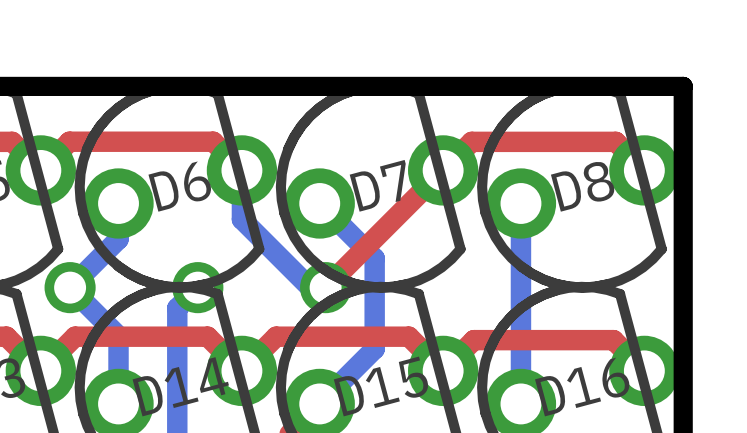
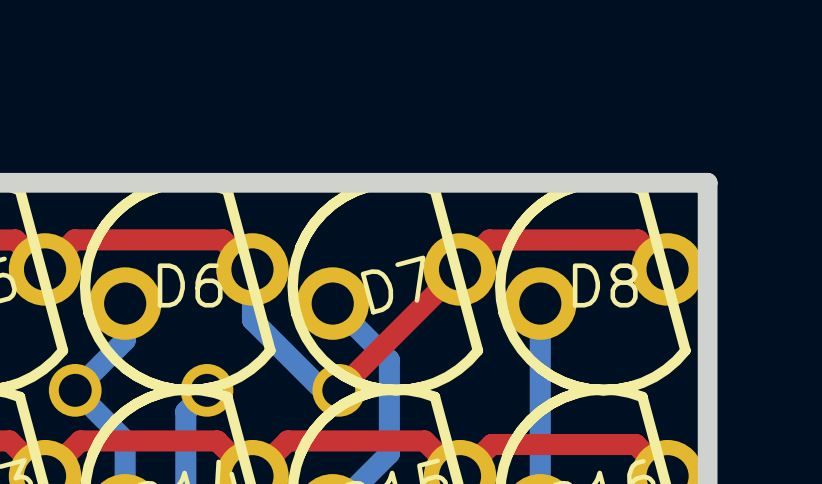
D6 name rotation: 0° (179, 186) -> 15° clockwise (190, 285)
D8 name rotation: 0° (582, 186) -> 15° clockwise (605, 285)

